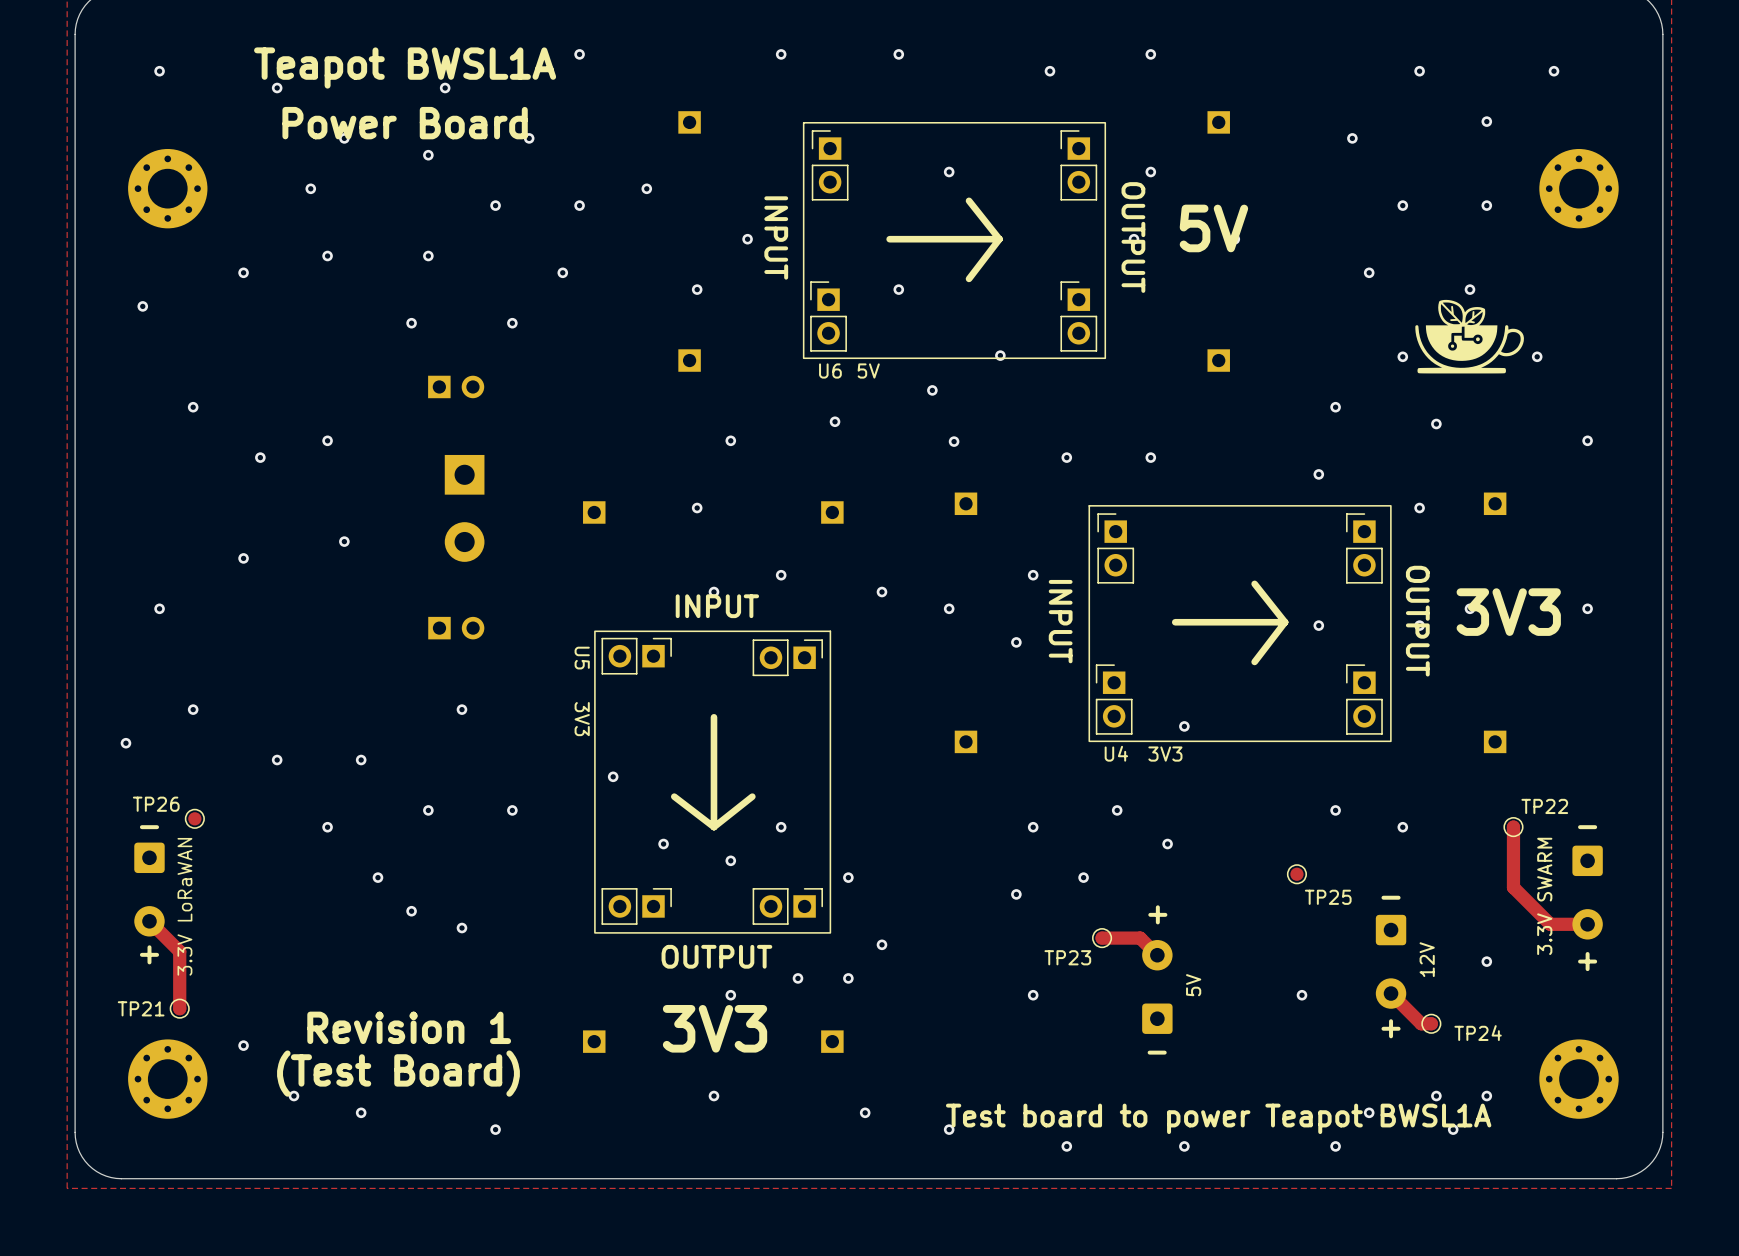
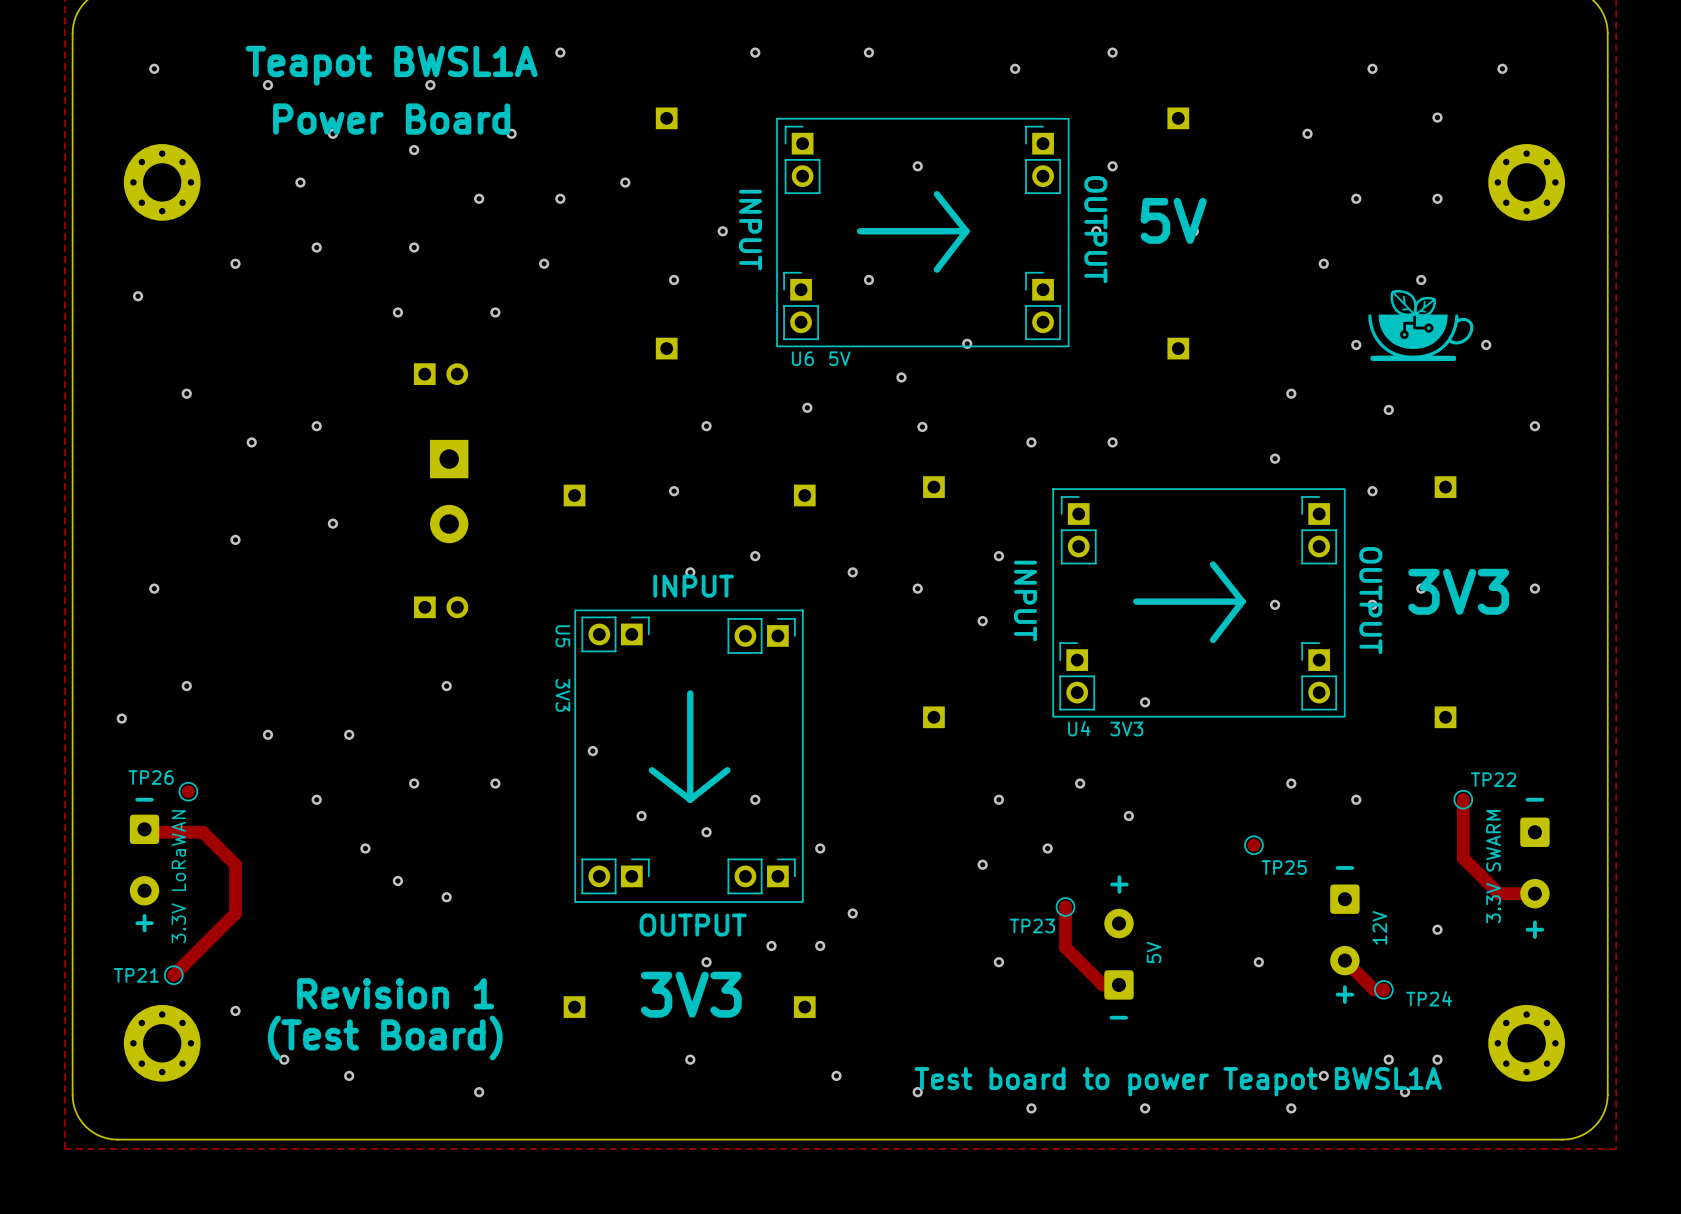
track: (149, 921) (179, 951) (179, 1008) -> (147, 832) (203, 832) (235, 864) (235, 913) (173, 975)
track: (1102, 938) (1140, 938) (1157, 955) -> (1065, 906) (1065, 947) (1102, 984) (1118, 984)

